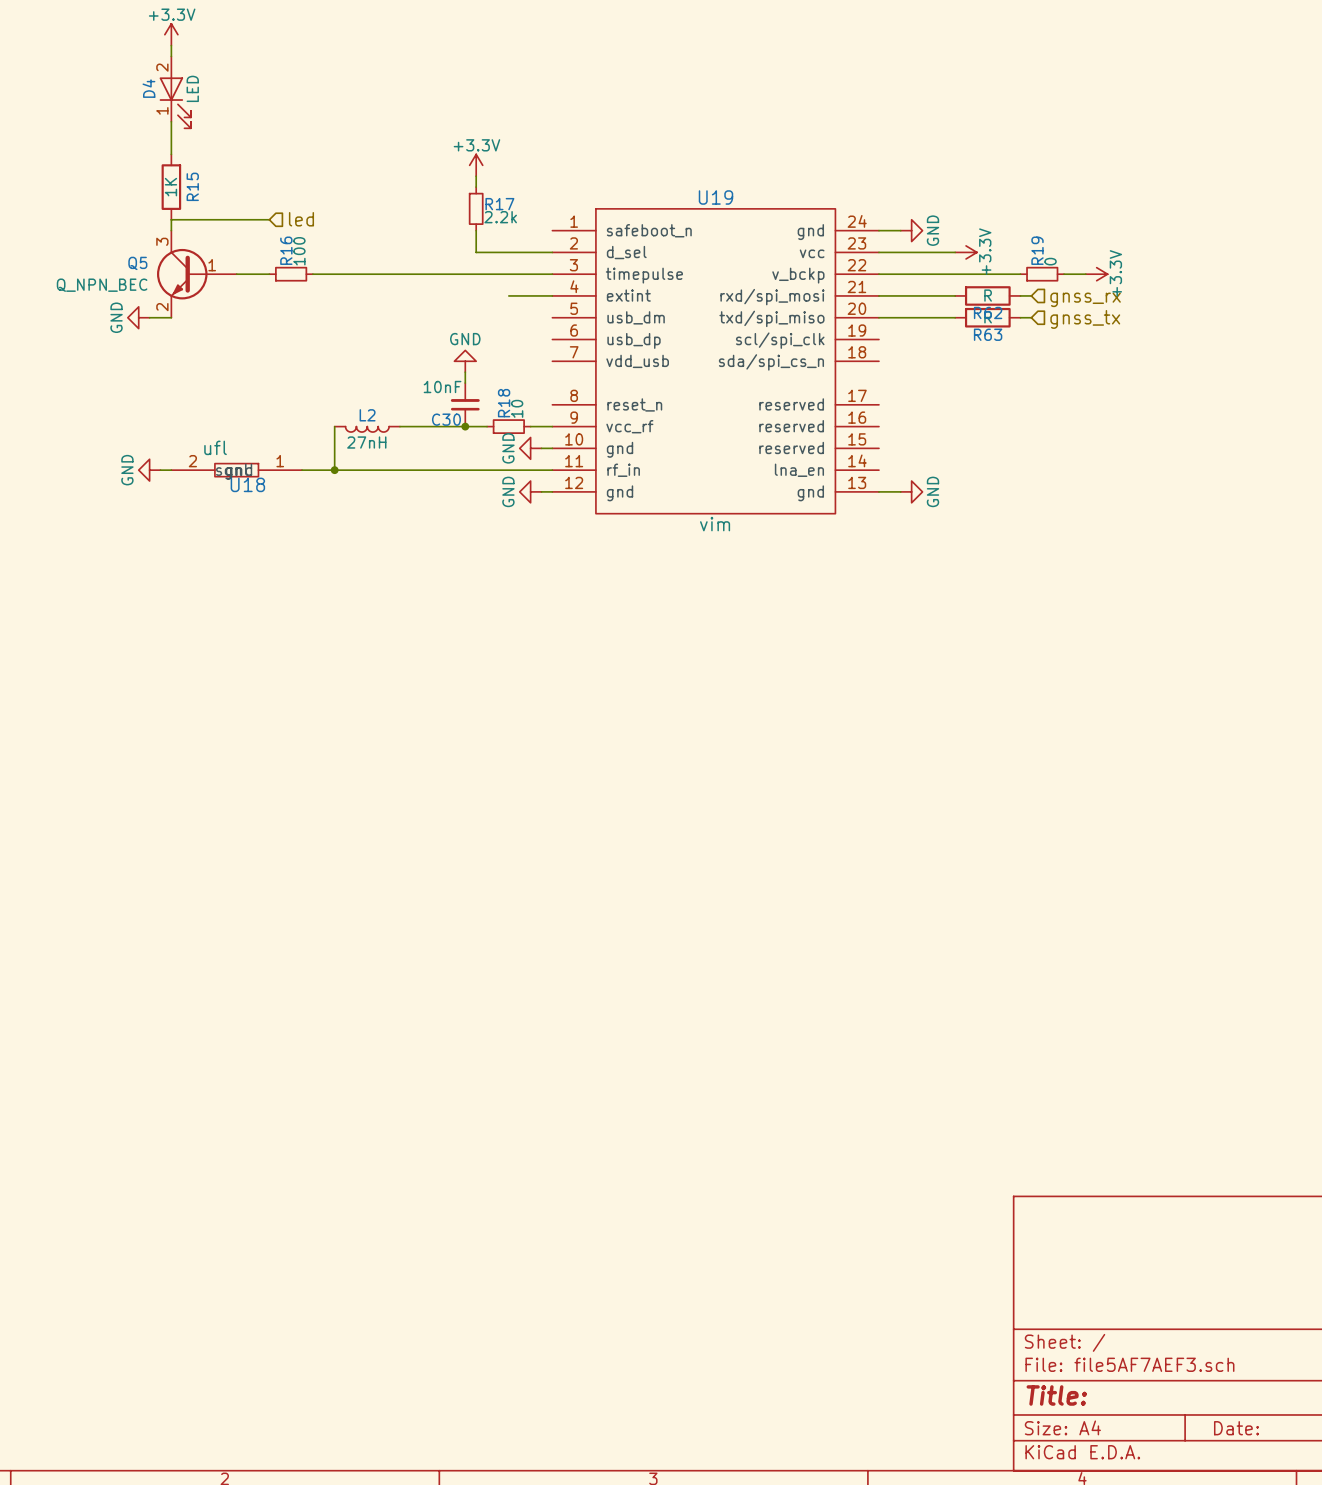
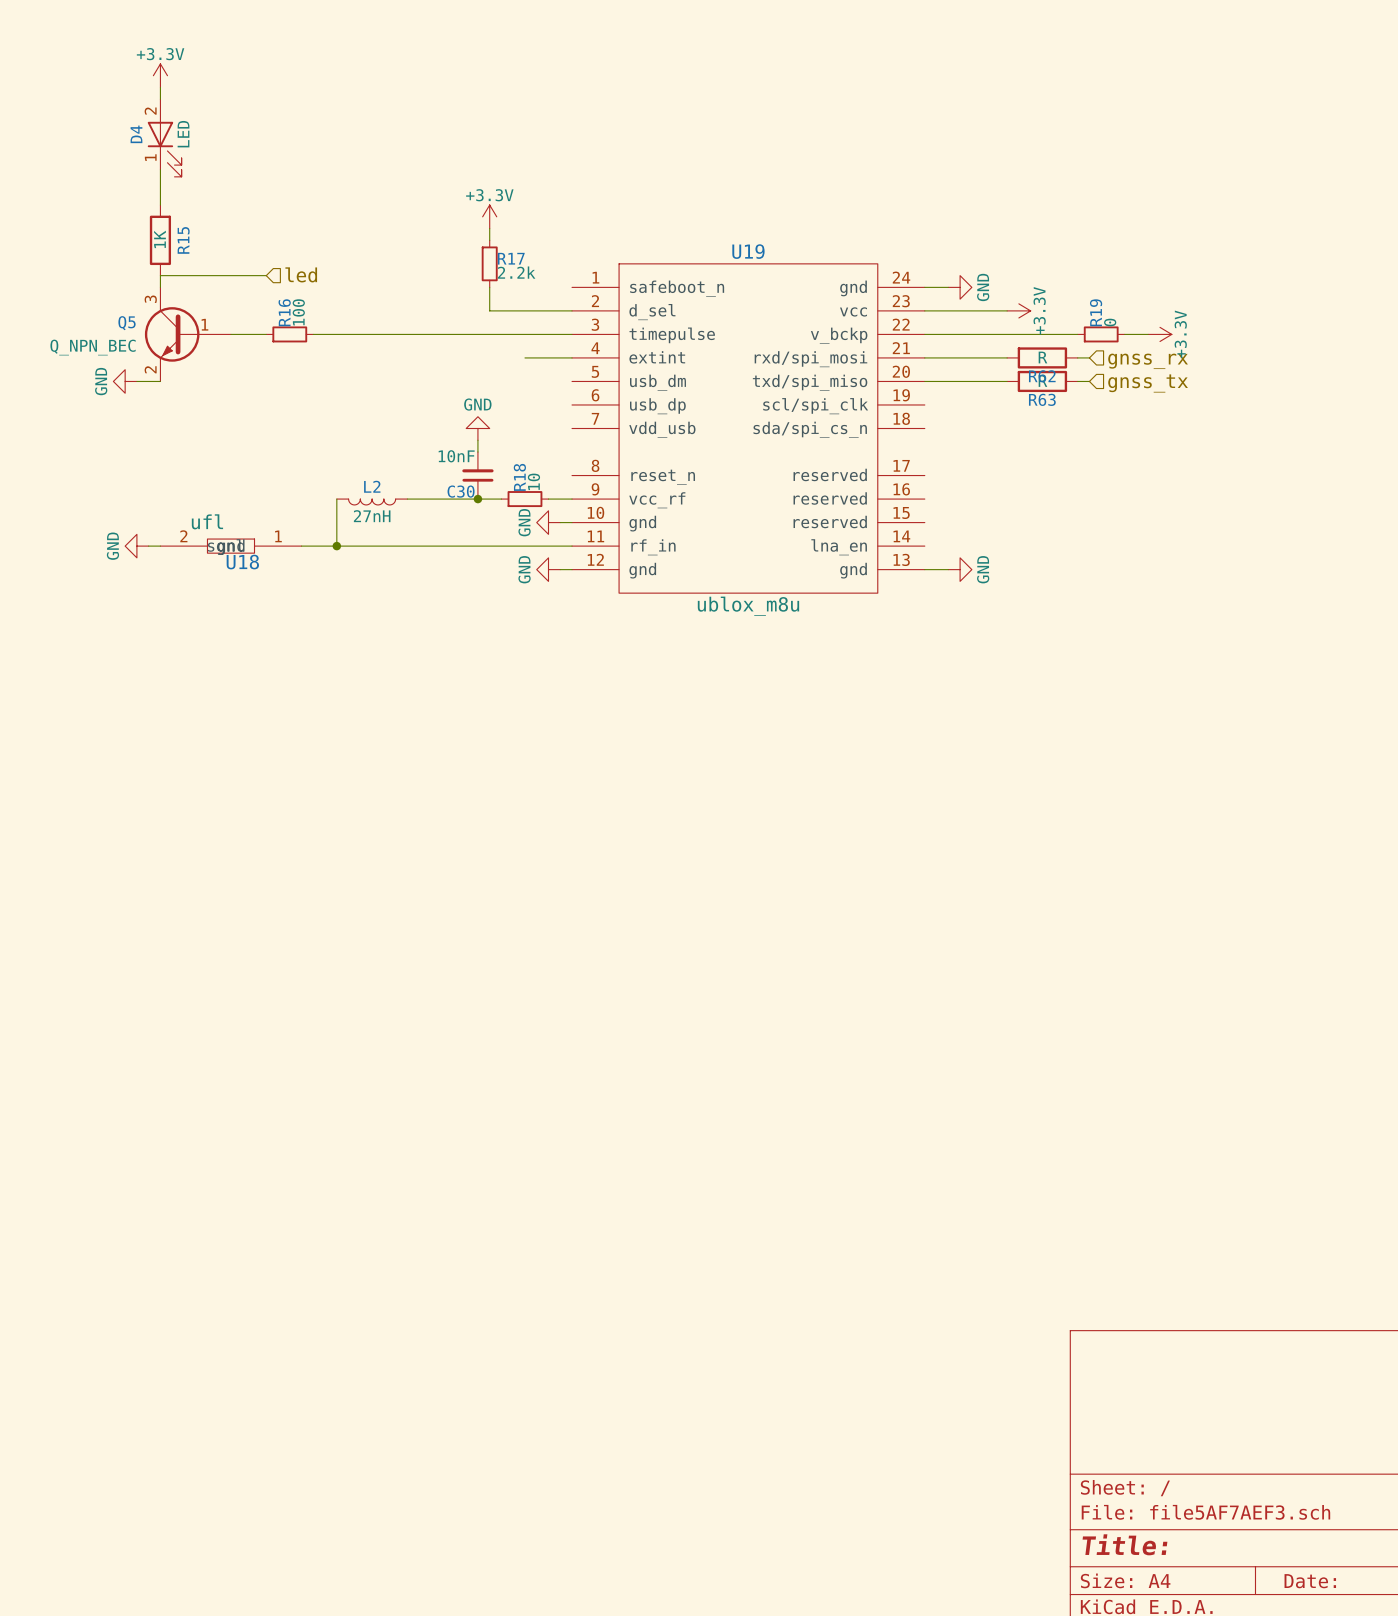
U19 value: vim (715, 524) -> ublox_m8u (748, 606)

